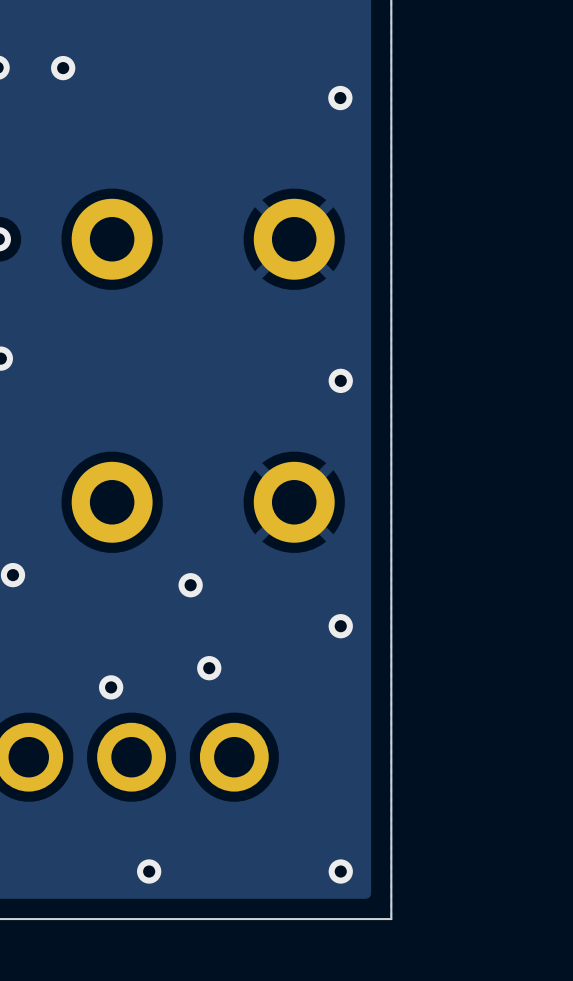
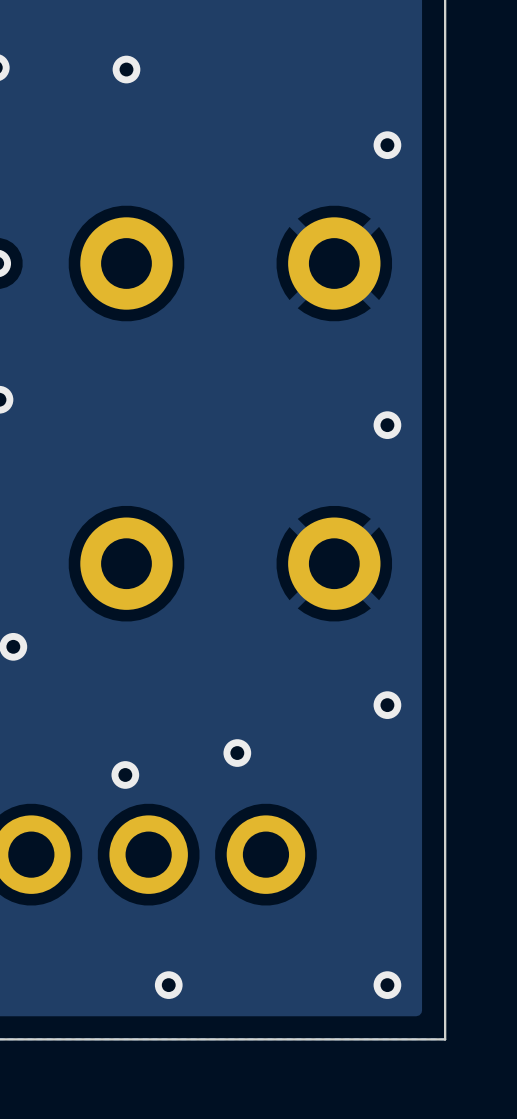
via position: (63, 68) -> (126, 69)
via position: (340, 98) -> (387, 145)
via: (190, 585) -> none

